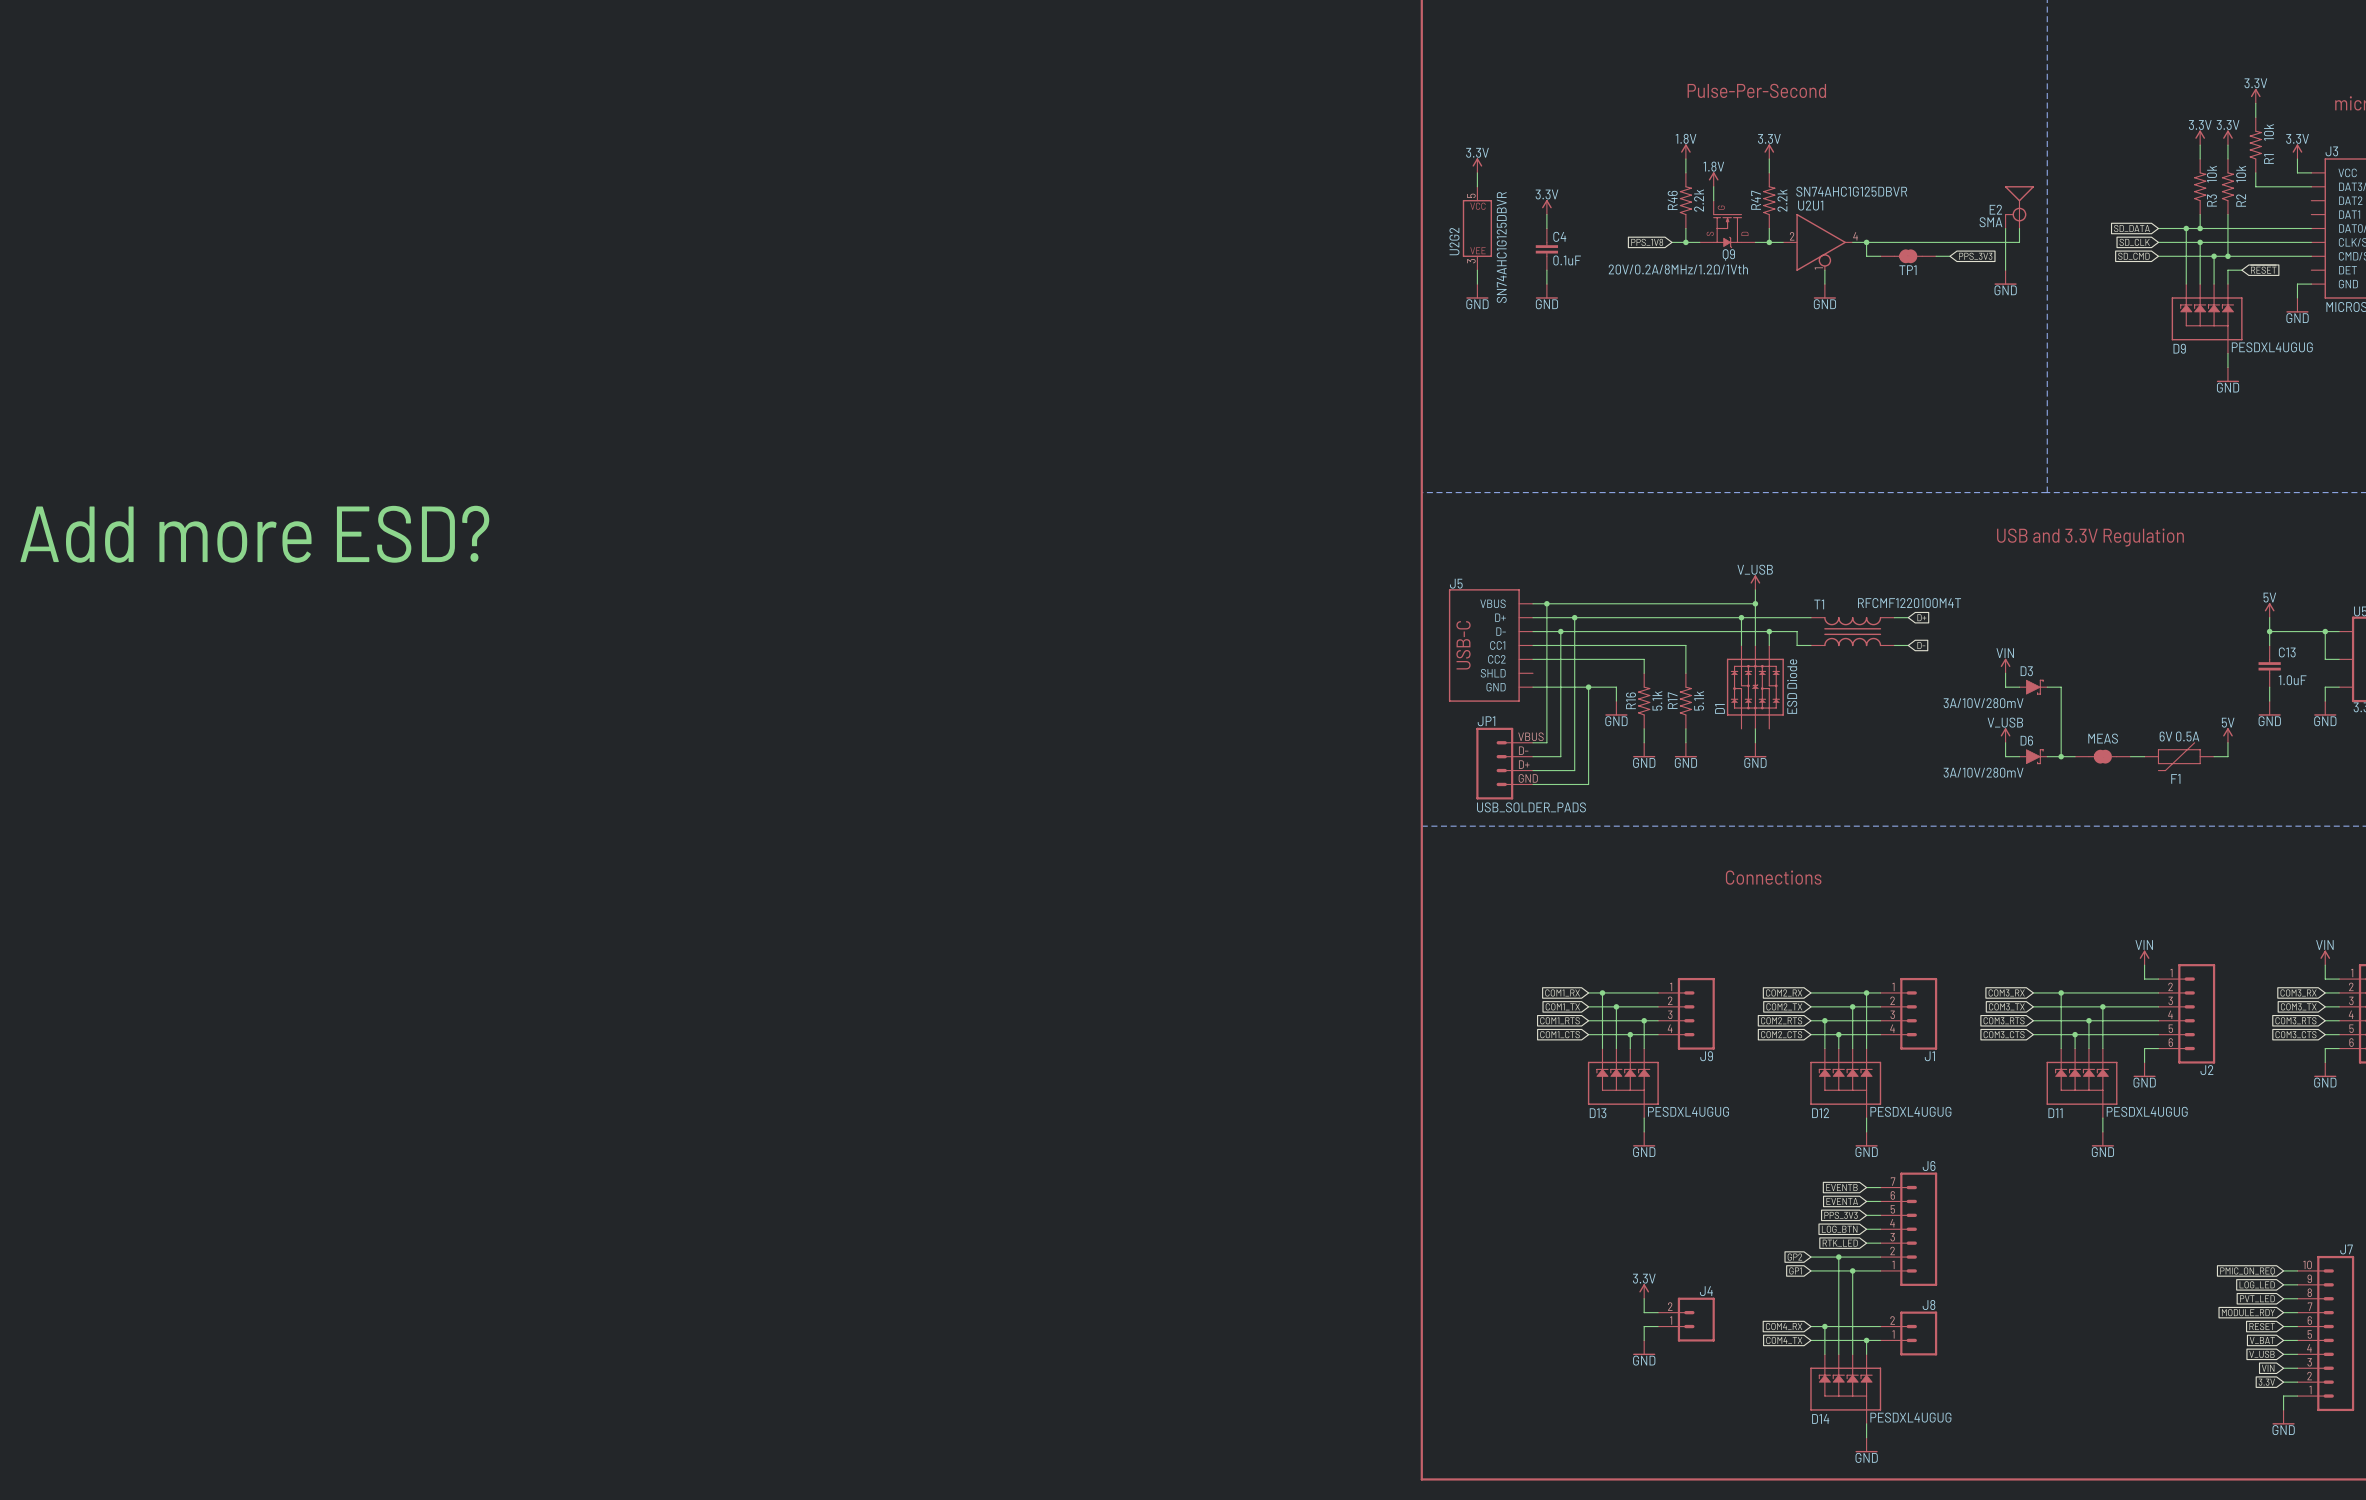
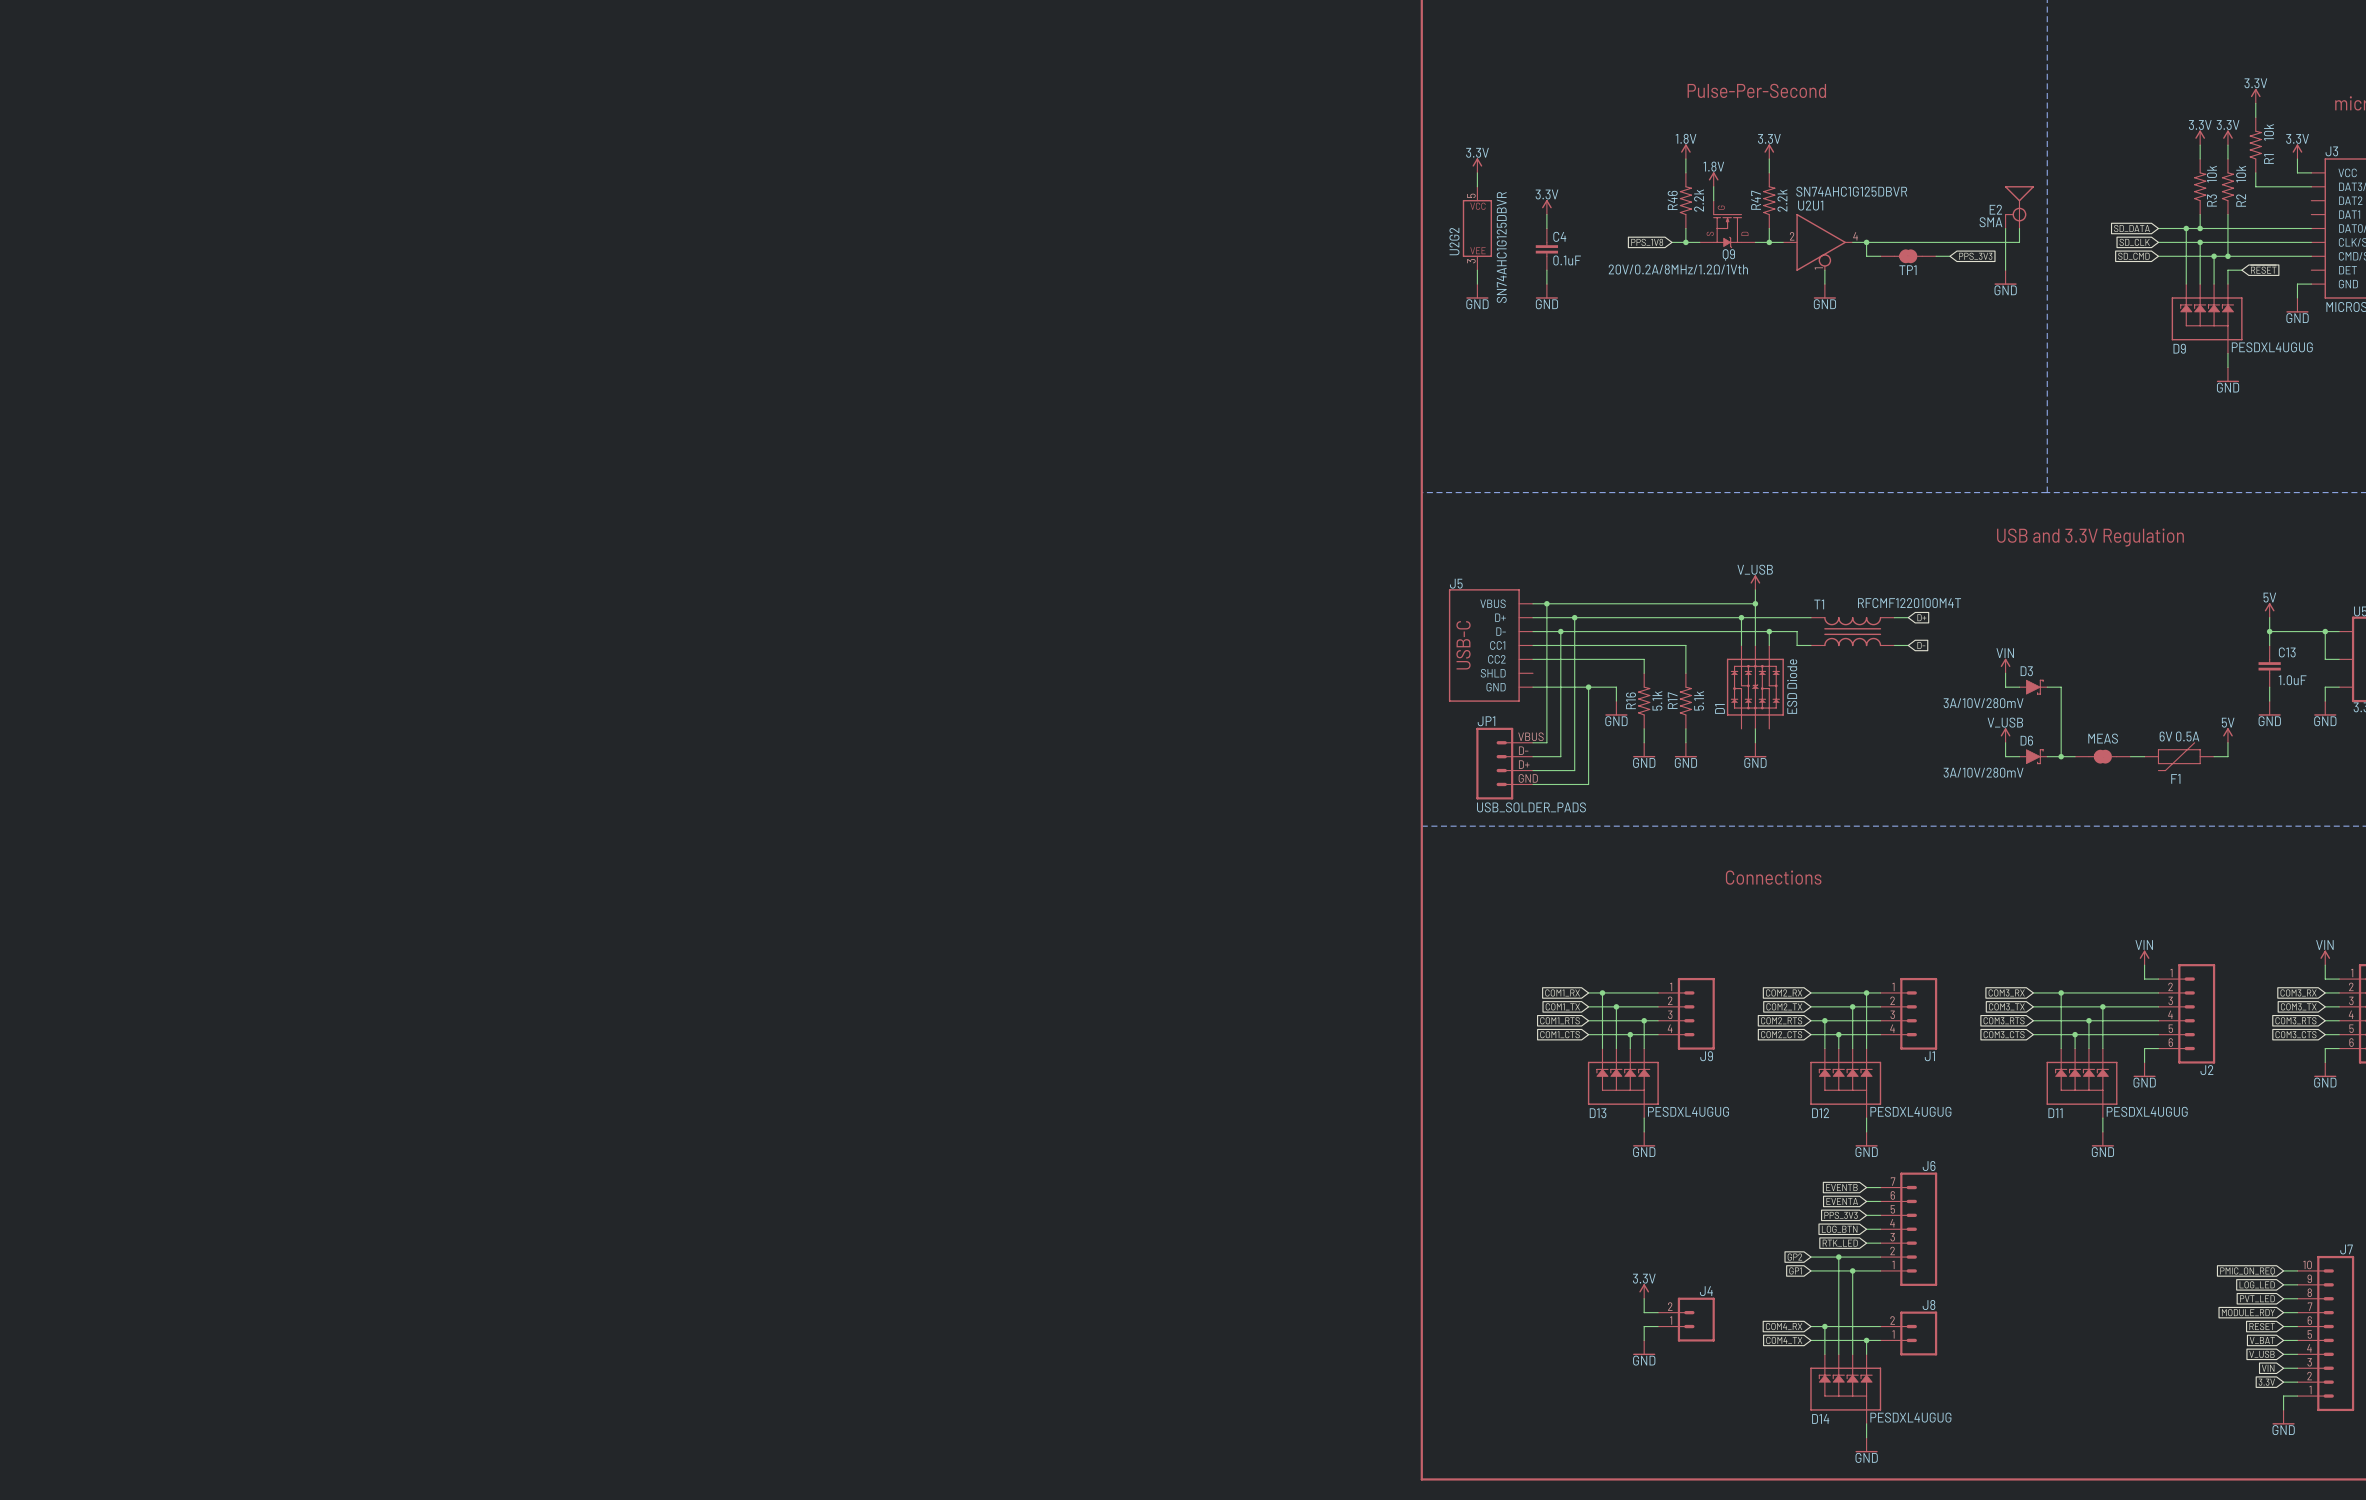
text: Add more ESD? (254, 534) -> none

